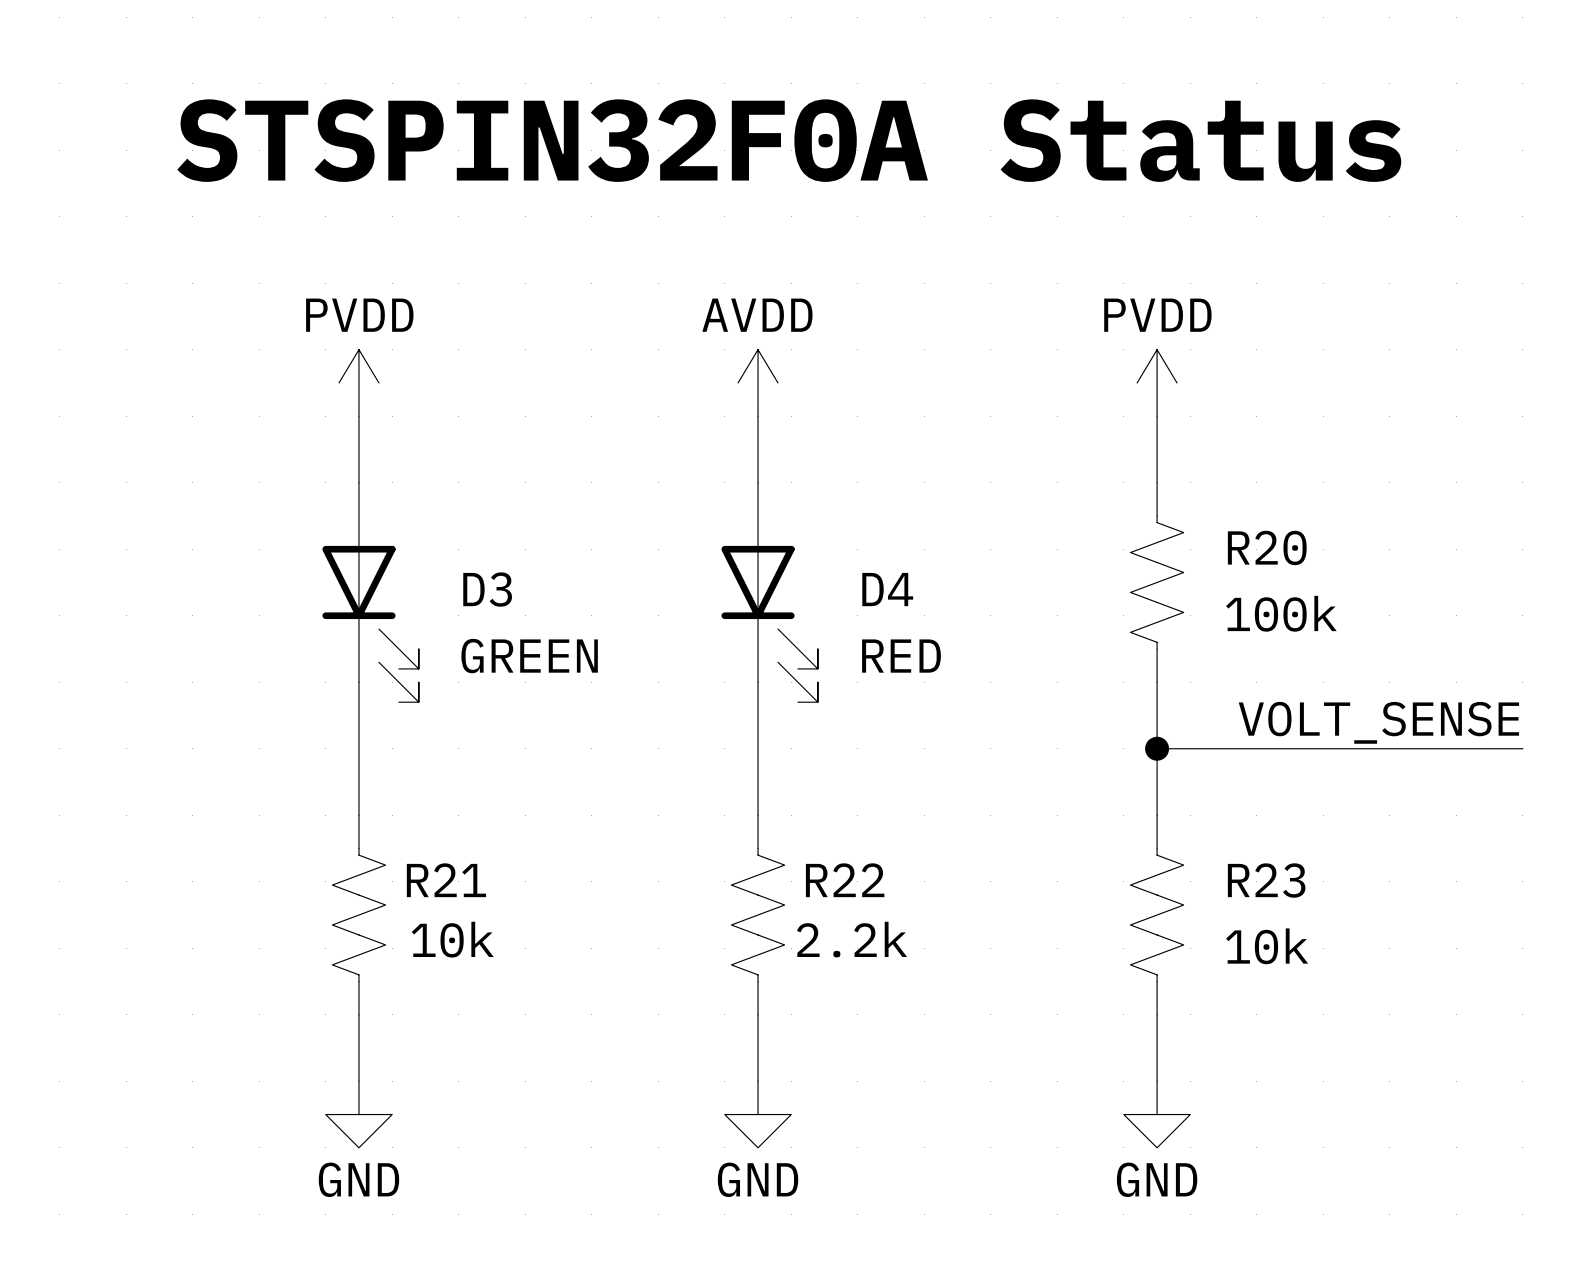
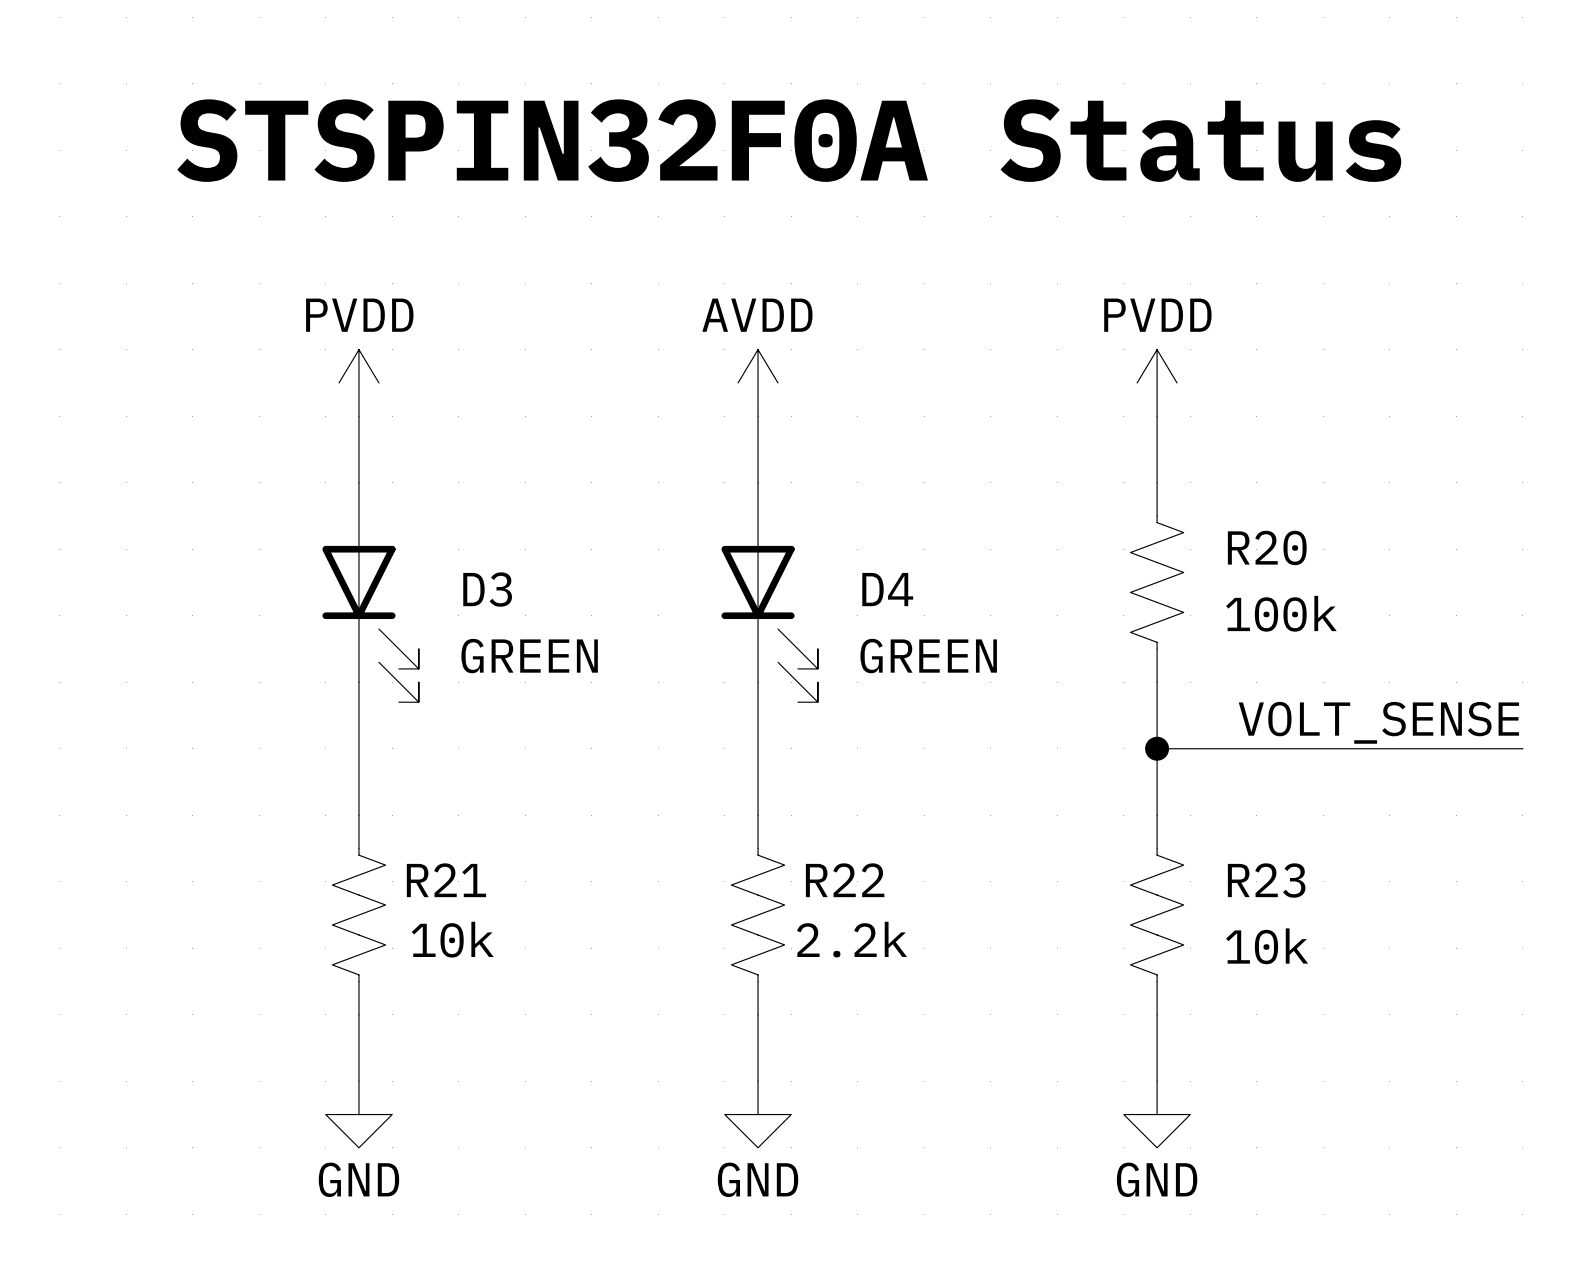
D4 value: RED (901, 656) -> GREEN (928, 656)

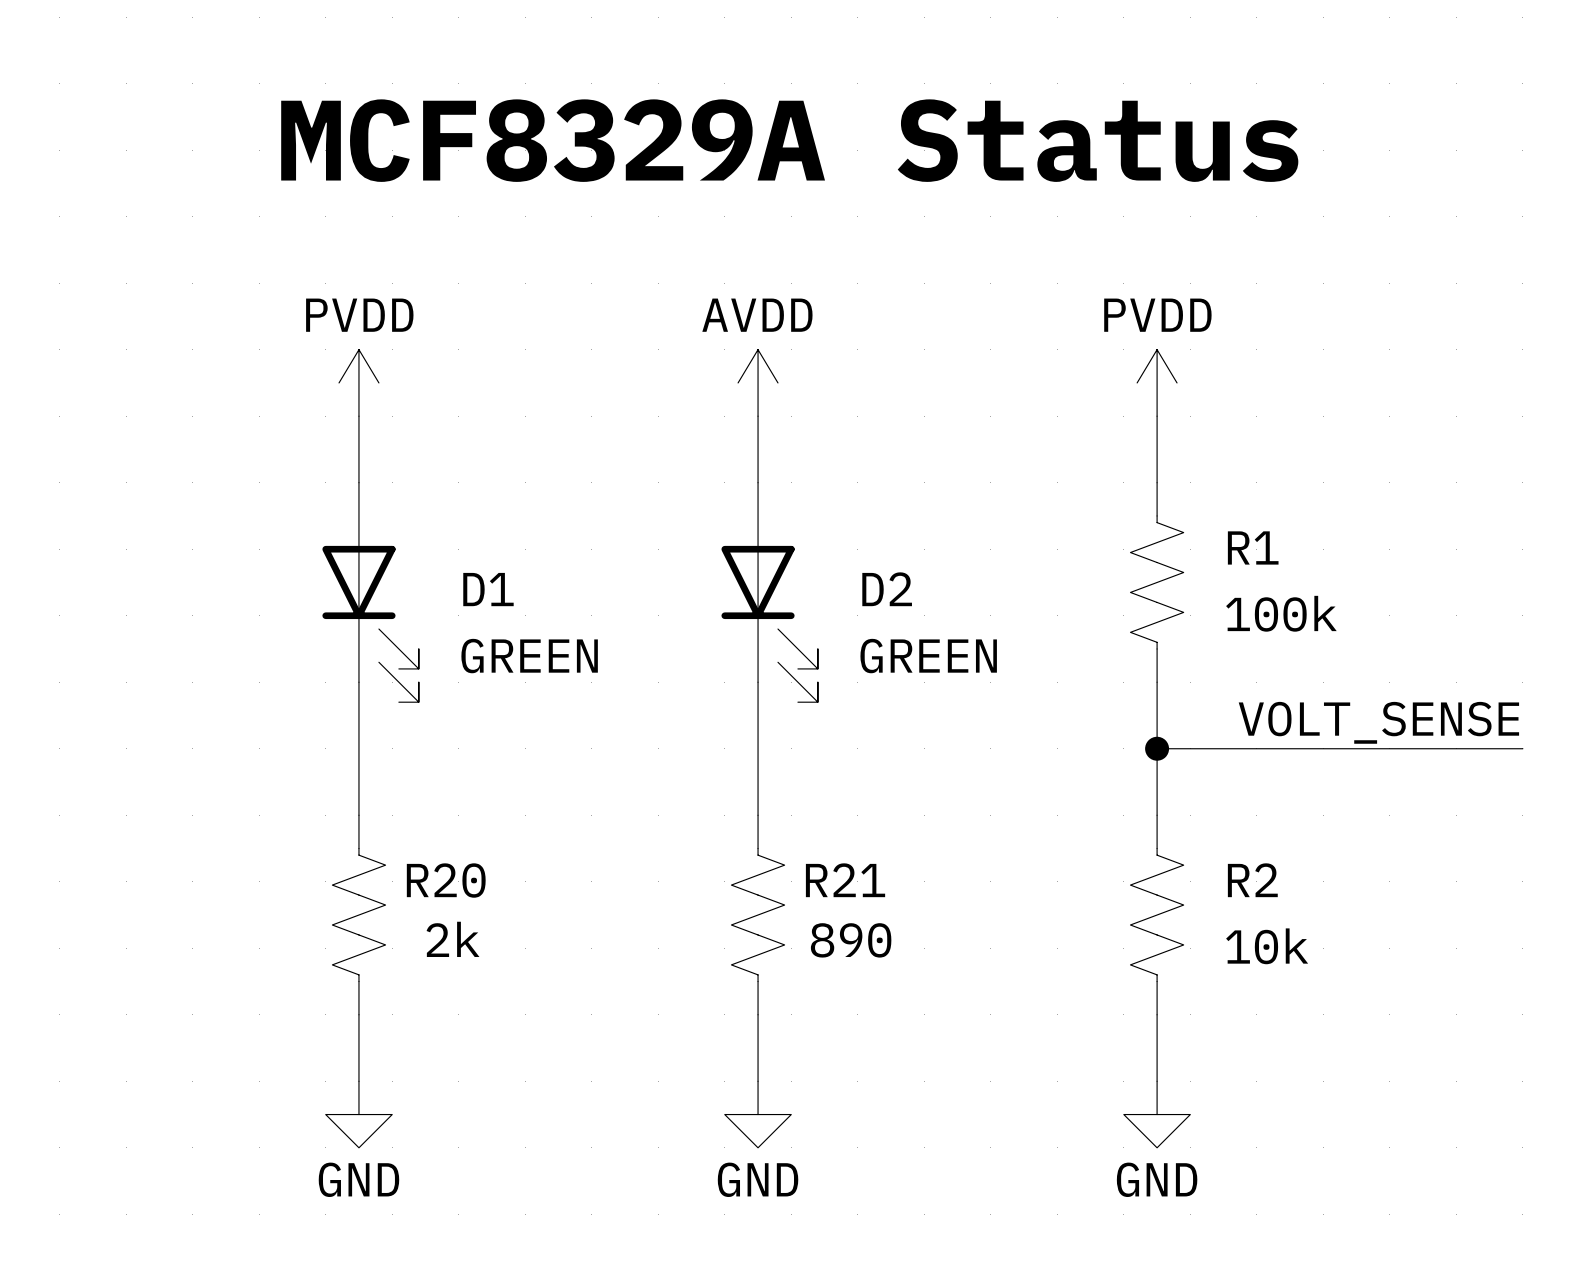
text: STSPIN32F0A Status (789, 140) -> MCF8329A Status (789, 140)
R20 name: R20 (1267, 547) -> R1 (1253, 547)
D3 name: D3 (487, 589) -> D1 (488, 589)
D4 name: D4 (887, 589) -> D2 (887, 589)
R21 name: R21 (446, 880) -> R20 (446, 880)
R22 name: R22 (845, 880) -> R21 (845, 880)
R23 name: R23 (1266, 880) -> R2 (1252, 880)
R21 value: 10k (452, 939) -> 2k (453, 939)
R22 value: 2.2k (852, 939) -> 890 (851, 940)

